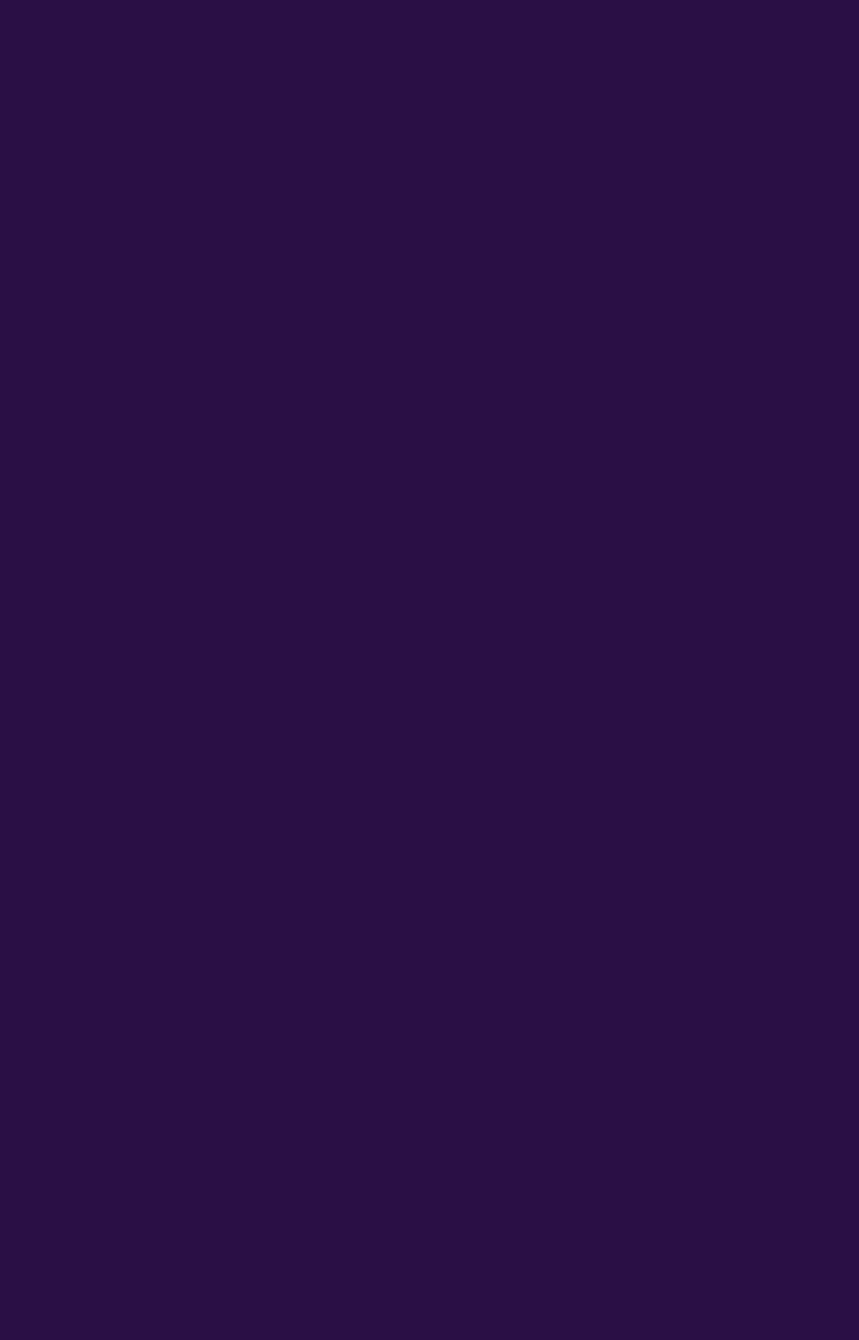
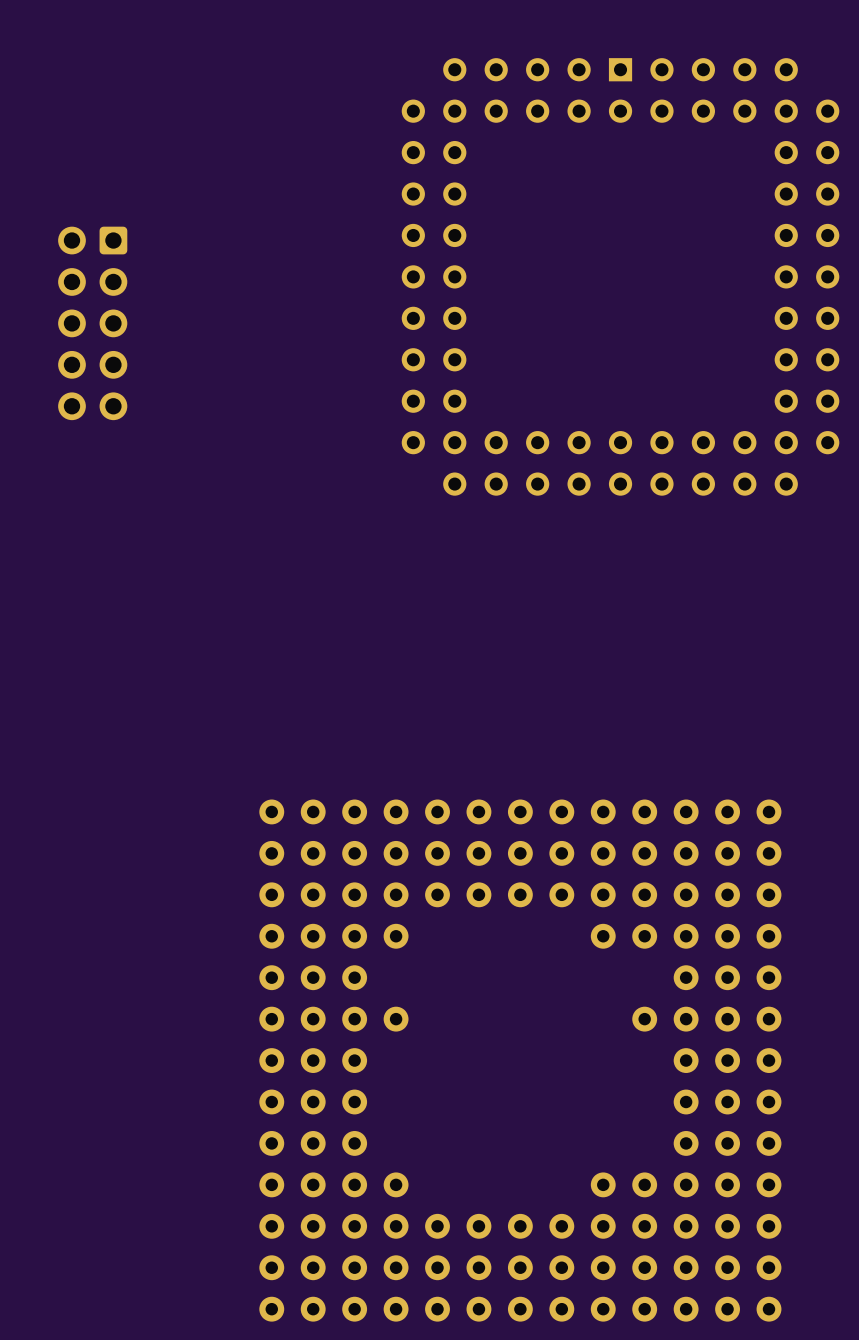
part: none -> (620, 276)
part: none -> (92, 323)
part: none -> (520, 1060)

